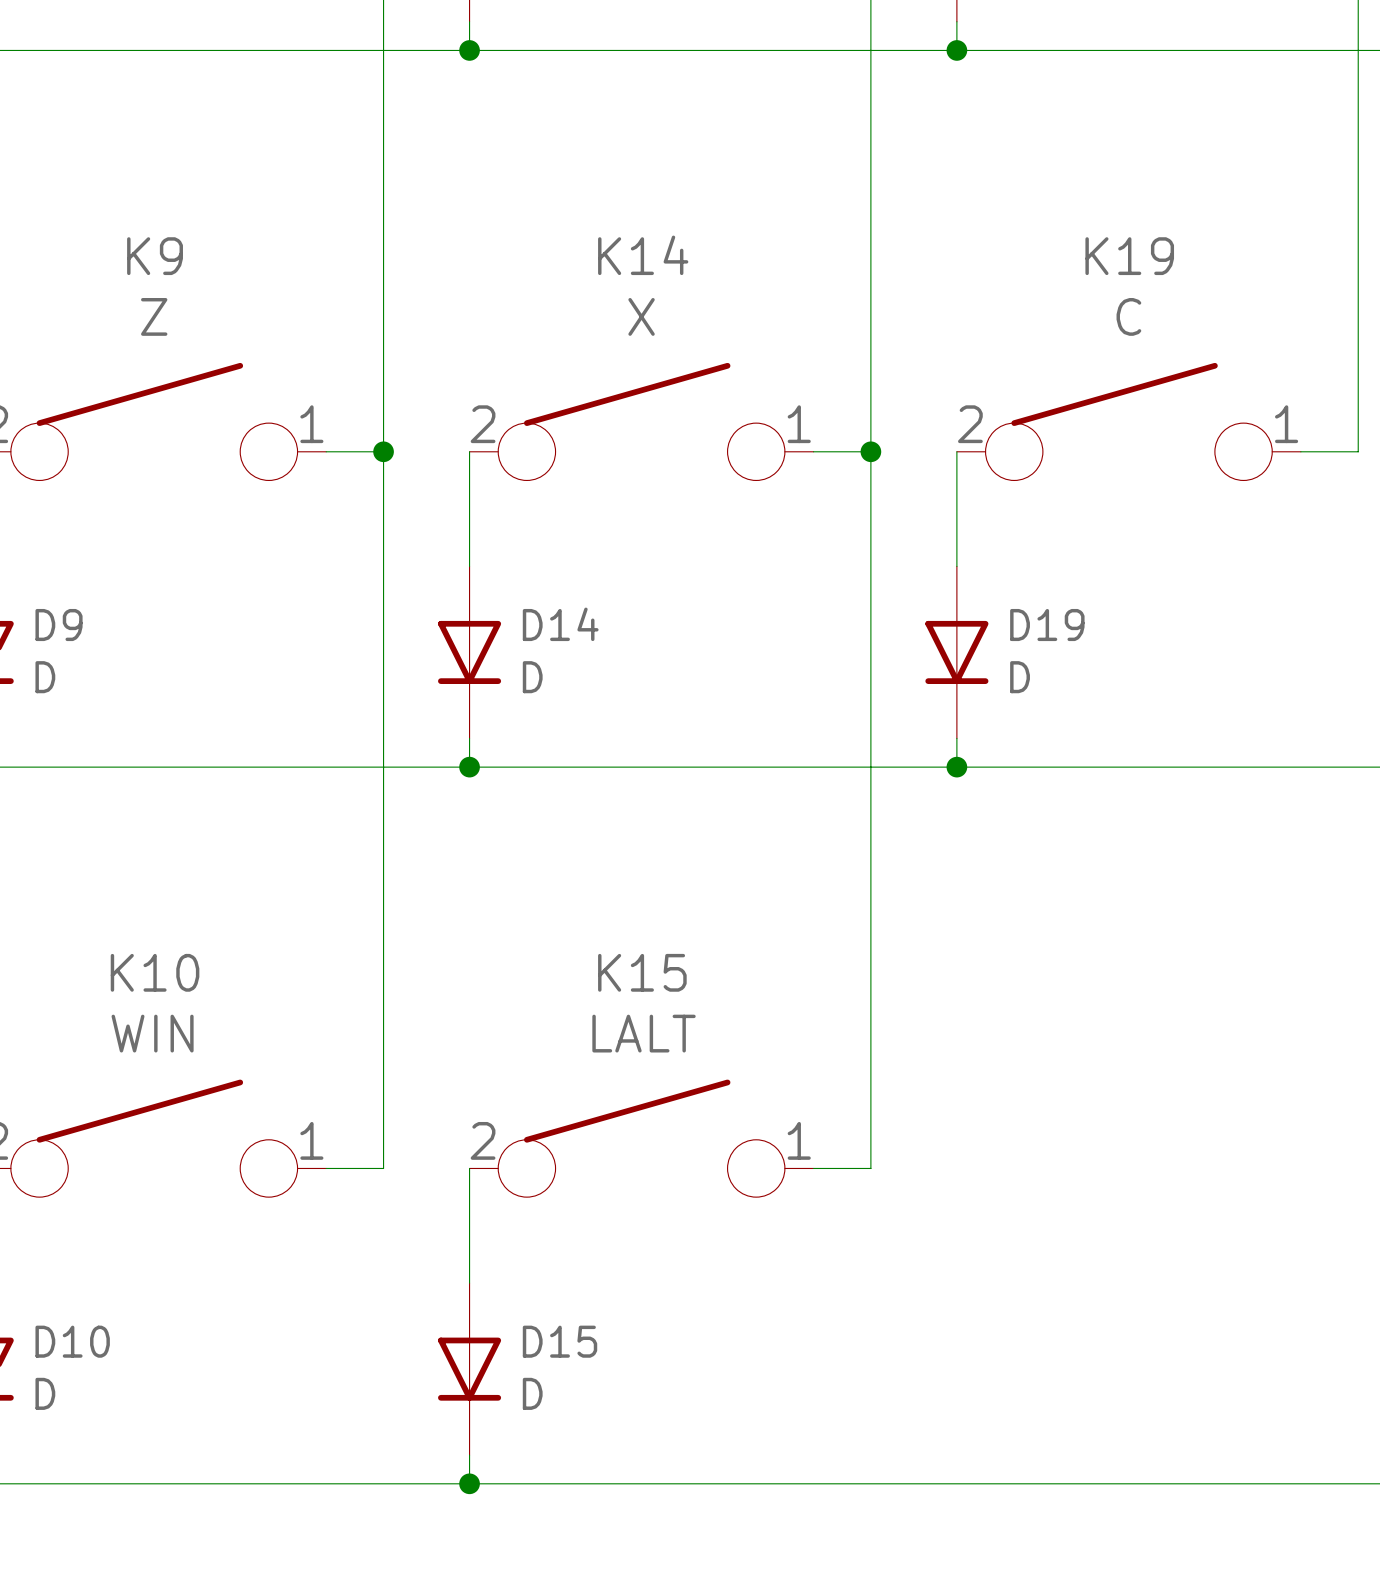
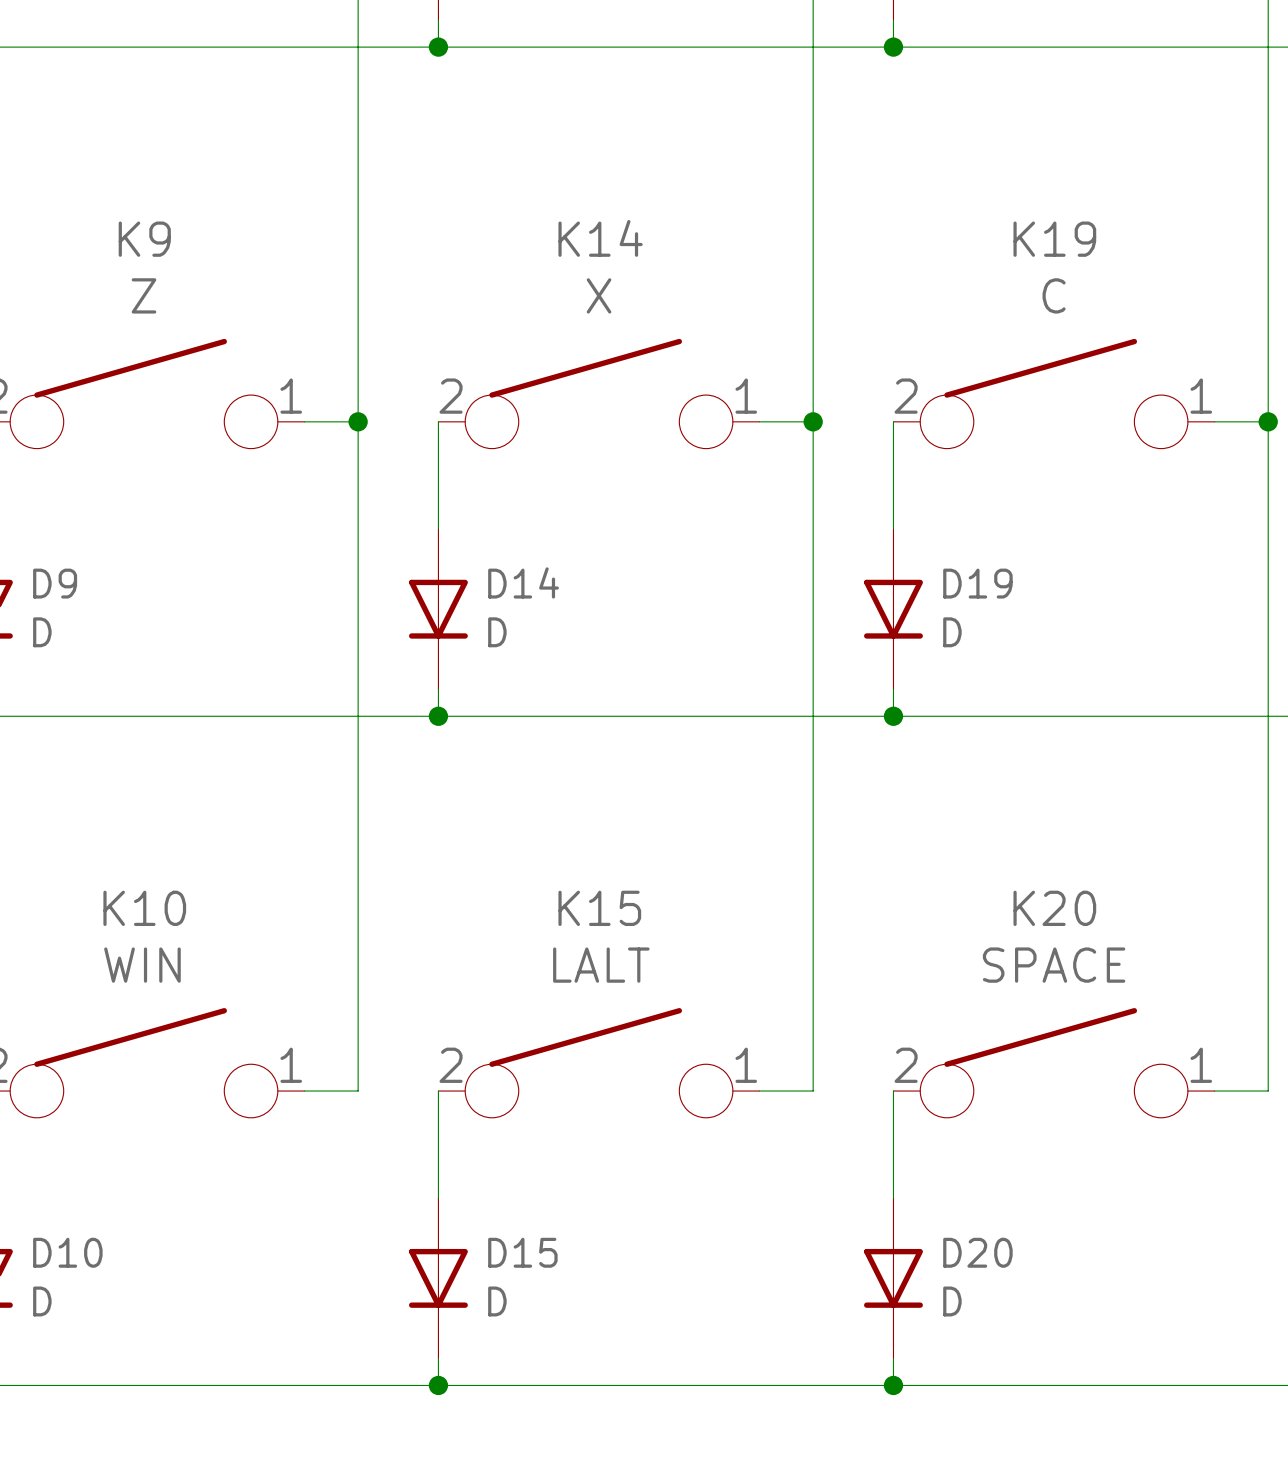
wire: none -> (1268, 421) (1268, 1091) (1214, 1091)
junction: none -> (1268, 421)
K20: none -> SPACE (1054, 1062)
wire: none -> (893, 1091) (893, 1198)
D20: none -> D (893, 1278)
wire: none -> (893, 1358) (893, 1385)
junction: none -> (893, 1385)

